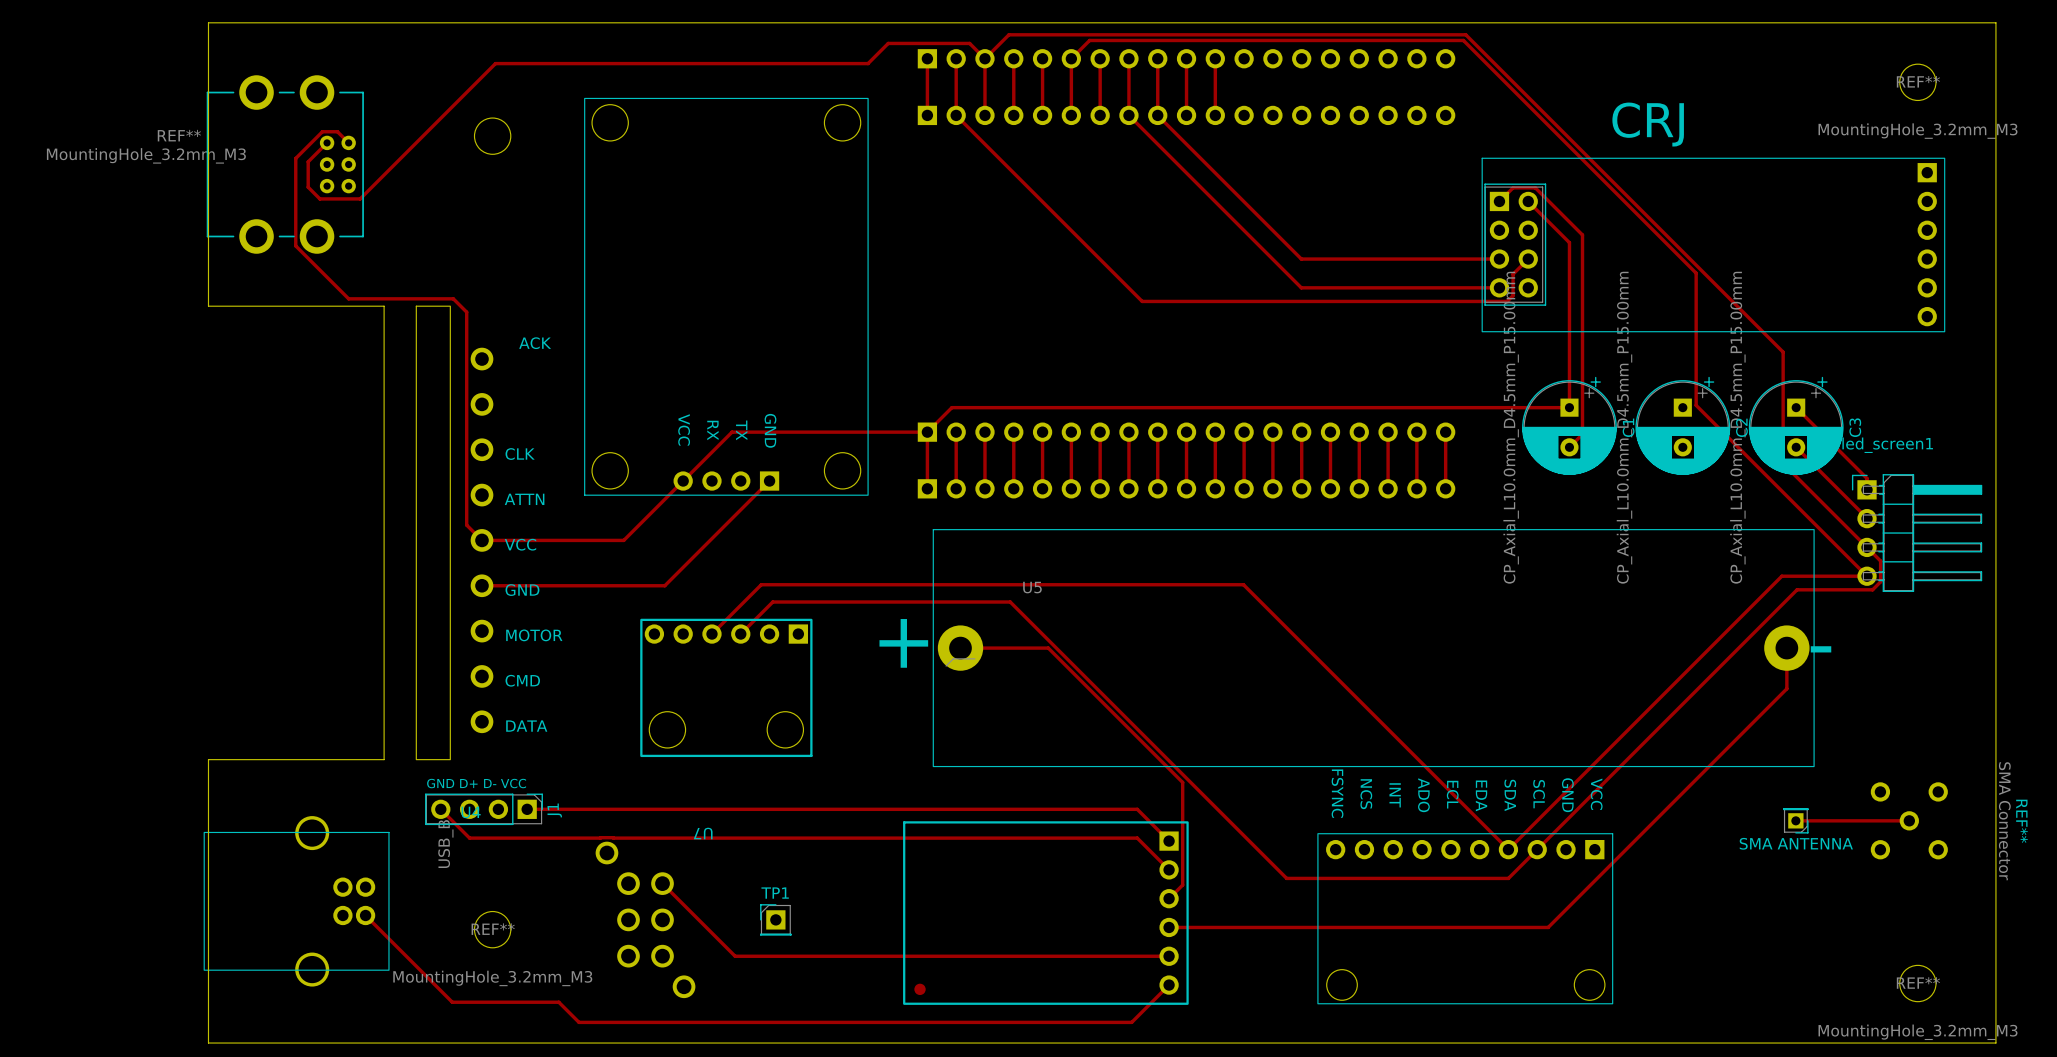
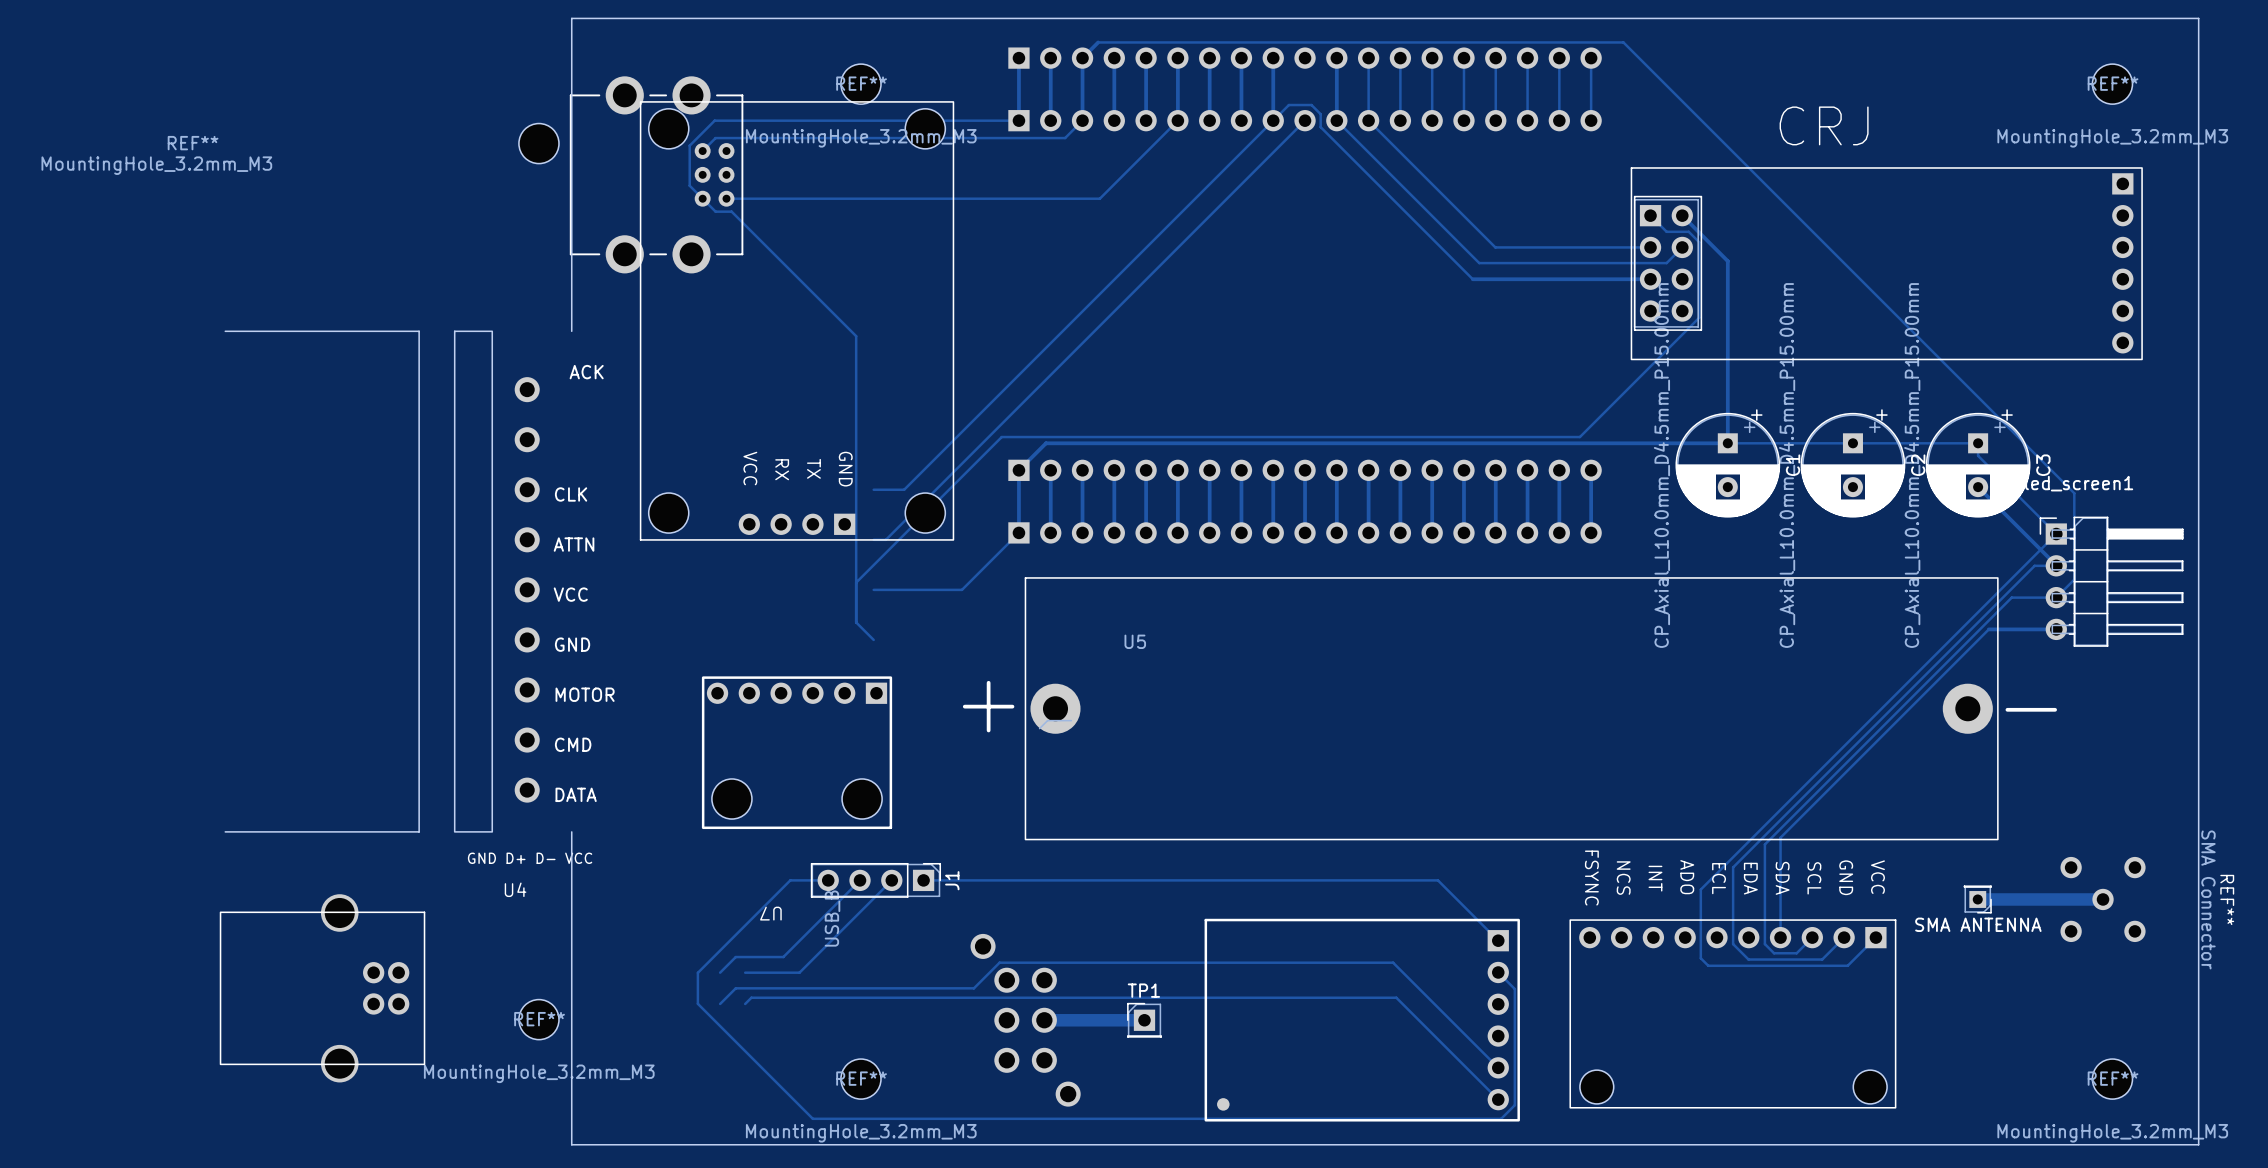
board edge: (522, 22) (208, 22) (208, 306) -> (571, 18) (571, 331)
track: (999, 44) (1008, 34) (1465, 34) (1783, 352) (1783, 463) (1880, 561) (1880, 581) (1872, 589) (1797, 589) (1508, 878) (1286, 878) (1010, 602) (772, 602) (740, 634) -> (1098, 42) (1623, 42) (2074, 493) (2074, 579) (2056, 597) (2011, 597) (1764, 844) (1764, 944) (1774, 953) (1796, 953) (1812, 937)
track: (984, 58) (969, 43) (888, 43) (868, 63) (495, 63) (360, 198) (319, 198) (308, 187) (308, 161) (327, 142) -> none
track: (1071, 58) (1089, 40) (1463, 40) (1696, 273) (1696, 405) (1867, 576) -> none
track: (1186, 58) (1186, 115) -> (873, 539) (885, 539) (1305, 120)
track: none -> (1368, 58) (1368, 120) (1495, 247) (1650, 247)
track: none -> (1400, 58) (1400, 120)
track: none -> (1432, 58) (1432, 120)
track: none -> (1463, 58) (1463, 120)
track: none -> (1495, 58) (1495, 120)
track: none -> (1527, 58) (1527, 120)
track: none -> (1559, 58) (1559, 120)
track: none -> (1591, 58) (1591, 120)
REF**: none -> MountingHole_3.2mm_M3 (860, 84)
track: none -> (1018, 120) (714, 120) (689, 145) (689, 185) (715, 211) (731, 211) (856, 336) (856, 622) (873, 639)
track: (956, 115) (1142, 301) (1507, 301) (1513, 295) (1513, 274) (1528, 259) -> none
track: none -> (1082, 120) (1065, 138) (715, 138) (702, 151)
track: none -> (1177, 120) (1099, 198) (726, 198)
track: (1128, 115) (1301, 287) (1499, 287) -> none
track: (1157, 115) (1301, 259) (1338, 259) -> (873, 489) (904, 489) (1288, 105) (1311, 105) (1320, 114) (1320, 127) (1472, 279)
track: none -> (1336, 120) (1479, 263) (1666, 263) (1682, 247)
track: (348, 142) (337, 131) (322, 131) (295, 158) (295, 245) (348, 298) (453, 298) (466, 312) (466, 525) (481, 540) (623, 540) (732, 432) (927, 432) -> none
part: (285, 164) -> none
part: none -> (656, 174)
track: (1499, 201) (1513, 187) (1535, 187) (1582, 234) (1582, 434) (1569, 447) -> (1650, 215) (1666, 231) (1688, 231) (1699, 242) (1699, 317) (1579, 437) (1001, 437) (856, 582)
track: none -> (1727, 443) (1978, 443) (1978, 455) (2056, 534) (1700, 889) (1700, 958) (1708, 965) (1847, 965) (1875, 937)
track: (1796, 407) (1867, 478) (1867, 489) -> none
track: (769, 481) (664, 585) (481, 585) -> none
track: none -> (1018, 532) (961, 589) (873, 589)
track: none -> (2056, 565) (2034, 565) (1733, 867) (1733, 944) (1748, 959) (1822, 959) (1844, 937)
track: (1805, 576) (1781, 576) (1508, 849) (1243, 584) (761, 584) (711, 634) -> (1988, 629) (1780, 837) (1780, 937)
U5 text: none -> + (988, 706)
text: + (903, 643) -> none
track: (960, 648) (1048, 648) (1182, 782) (1182, 885) (1169, 898) -> none
track: (1786, 648) (1786, 688) (1548, 927) (1169, 927) -> none
board edge: (208, 759) (208, 1043) (522, 1043) -> (571, 831) (571, 1144)
track: none -> (828, 880) (790, 880) (697, 972) (697, 1003) (812, 1118) (1501, 1118) (1514, 1105) (1514, 989) (1498, 972)
track: none -> (860, 880) (783, 957) (735, 957) (720, 972)
track: none -> (891, 880) (799, 972) (745, 972)
track: none -> (923, 880) (1437, 880) (1498, 940)
track: (440, 809) (469, 838) (1137, 838) (1169, 869) -> none
J1 position: (484, 809) -> (875, 880)
track: (527, 809) (1137, 809) (1169, 841) -> none
track width: thin (1795, 820) (1909, 820) -> thick (1977, 899) (2103, 899)
track: (662, 883) (735, 956) (1169, 956) -> none
part position: (1045, 913) -> (1362, 1020)
track: (365, 915) (452, 1002) (558, 1002) (579, 1022) (1131, 1022) (1169, 985) -> none
track: none -> (720, 1003) (735, 988) (973, 988) (999, 962) (1393, 962) (1498, 1067)
track: none -> (745, 1003) (751, 997) (1396, 997) (1498, 1099)
part position: (1465, 918) -> (1732, 1013)
part: (645, 919) -> none
TP1 position: (775, 919) -> (1144, 1020)
part: none -> (1025, 1020)
track: none -> (1044, 1020) (1144, 1020) (1144, 1025)
REF**: none -> MountingHole_3.2mm_M3 (860, 1079)

